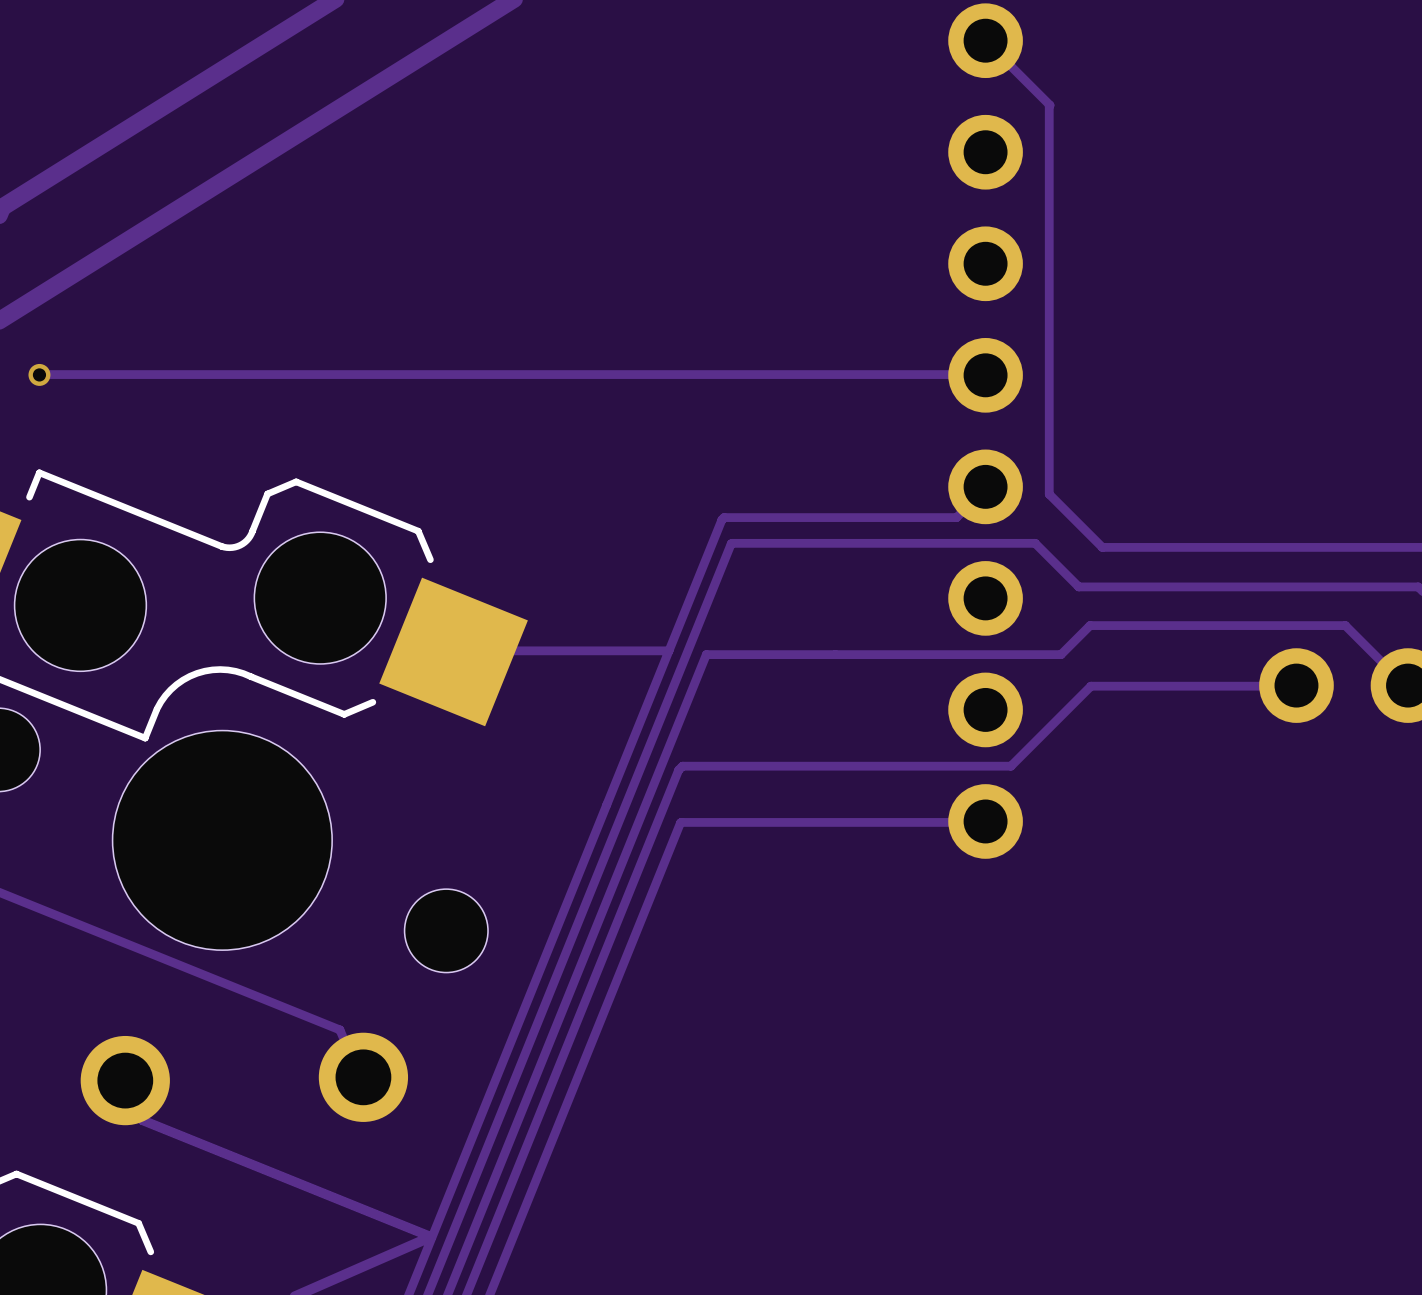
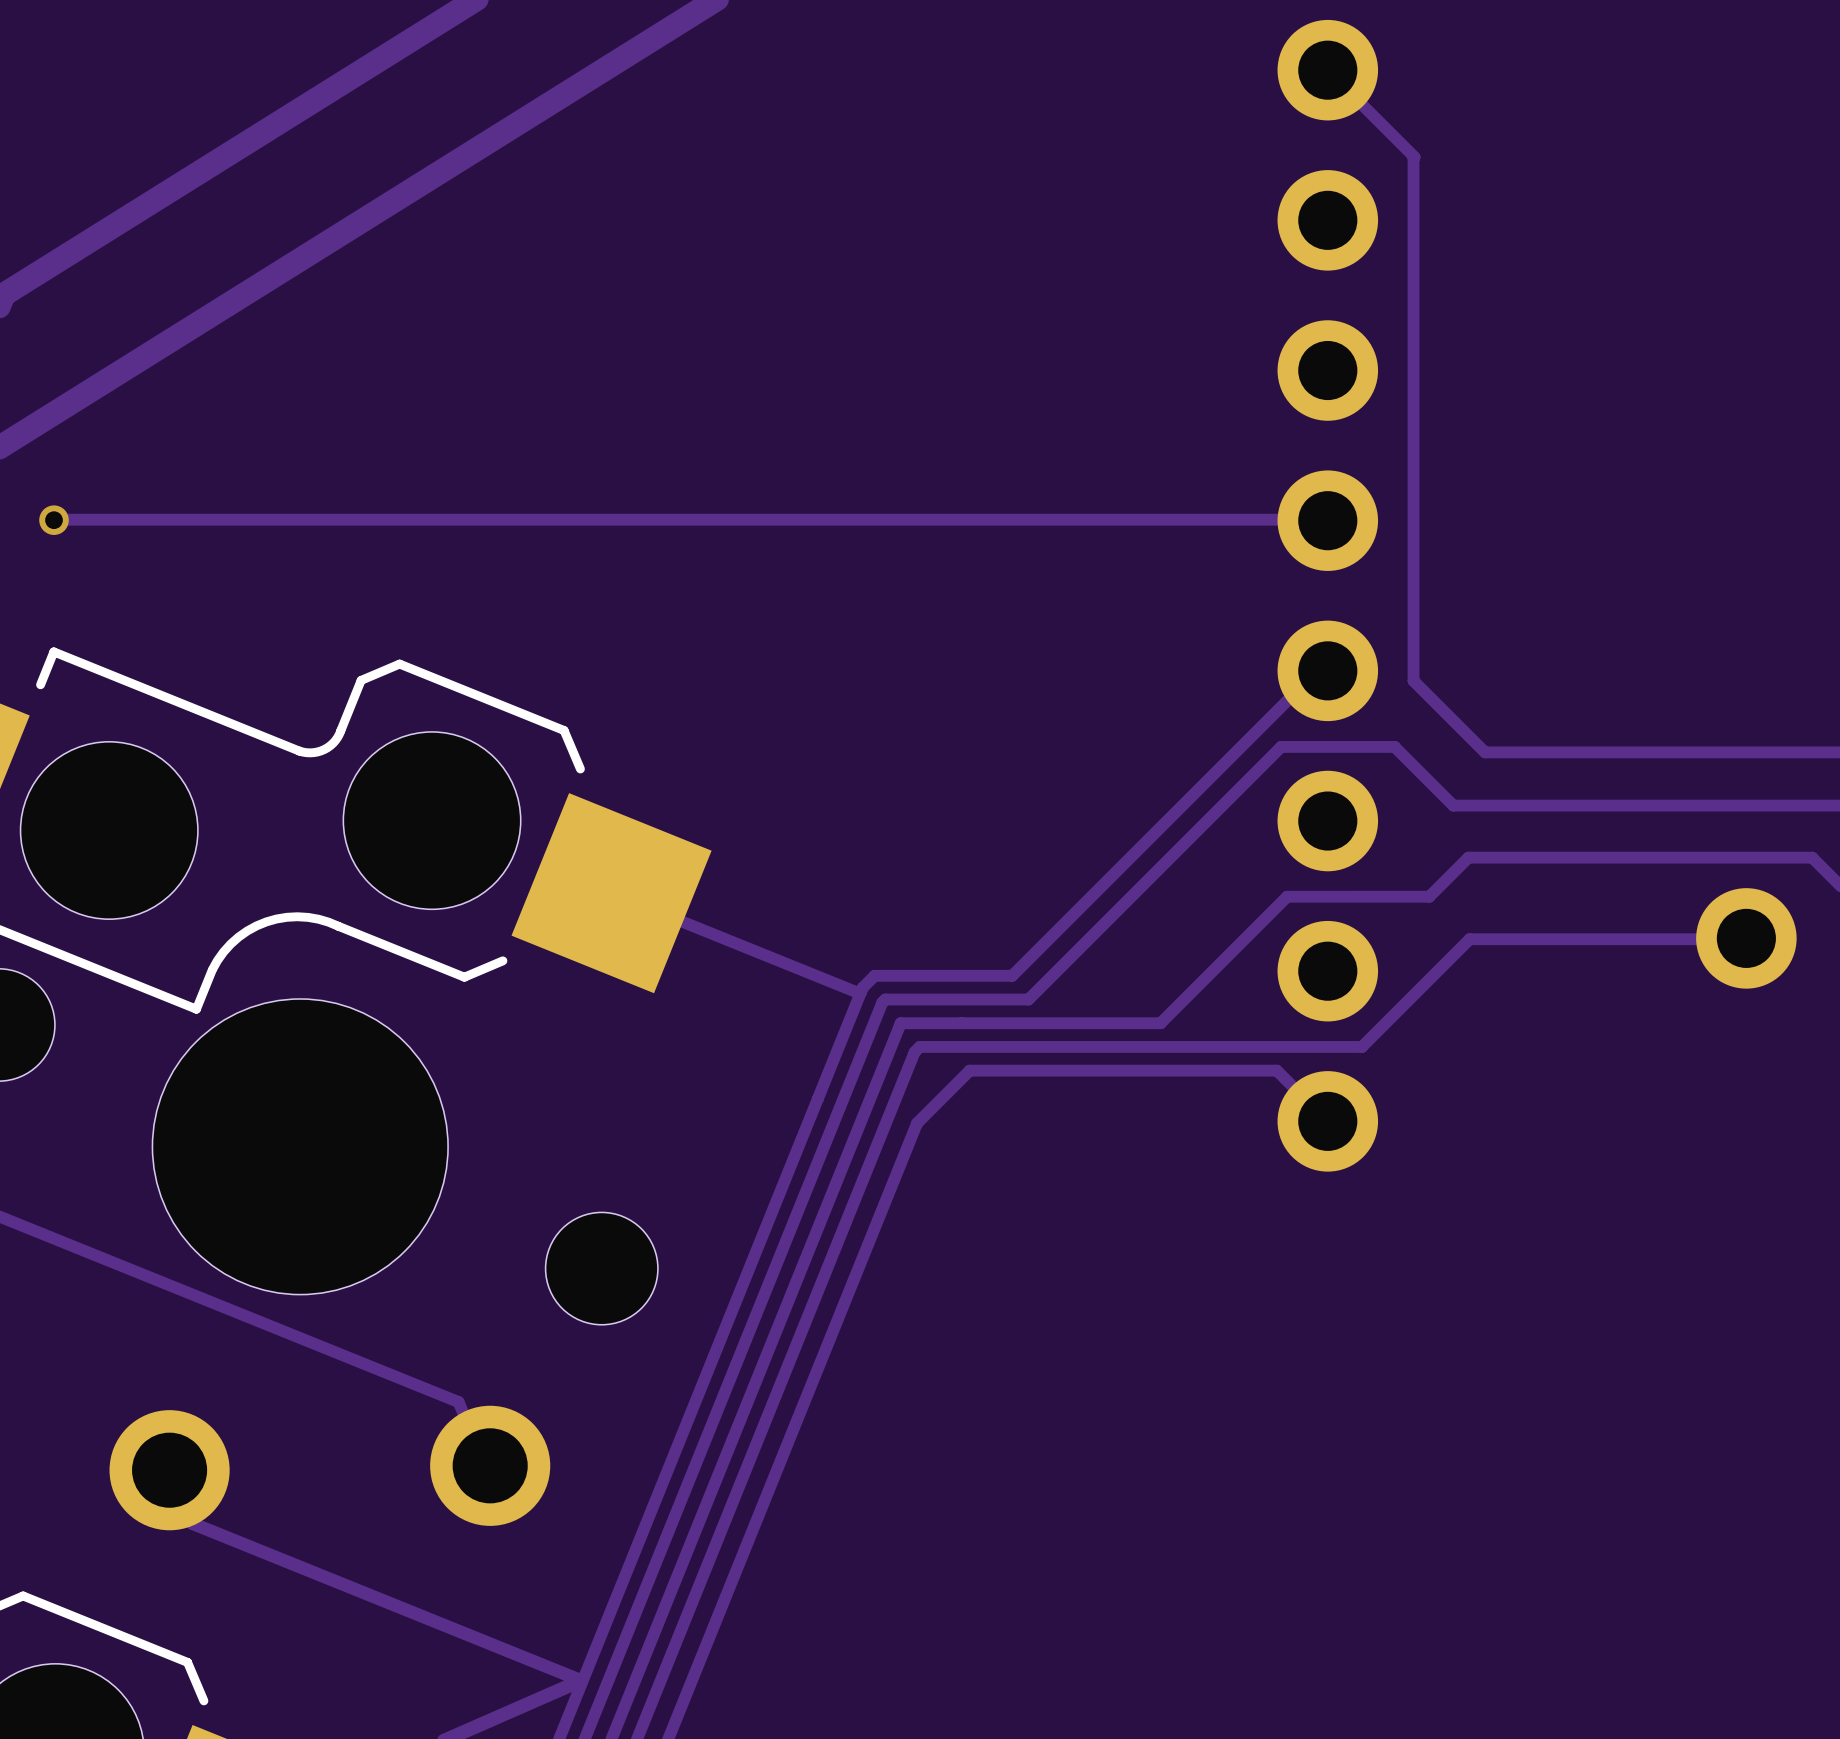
track: (986, 487) (956, 517) (724, 517) (638, 725) -> none
track: (950, 543) (731, 543) (654, 733) -> (1281, 746) (1028, 999) (885, 999) (882, 1002)
track: (668, 650) (453, 650) -> (1317, 670) (1012, 975) (874, 975) (859, 993) (611, 893)
track: (1061, 654) (706, 654) (668, 748) -> (1429, 896) (1287, 896) (1160, 1023) (900, 1023)
track: (986, 822) (680, 822) -> (1328, 1122) (1276, 1070) (969, 1070) (917, 1123)

